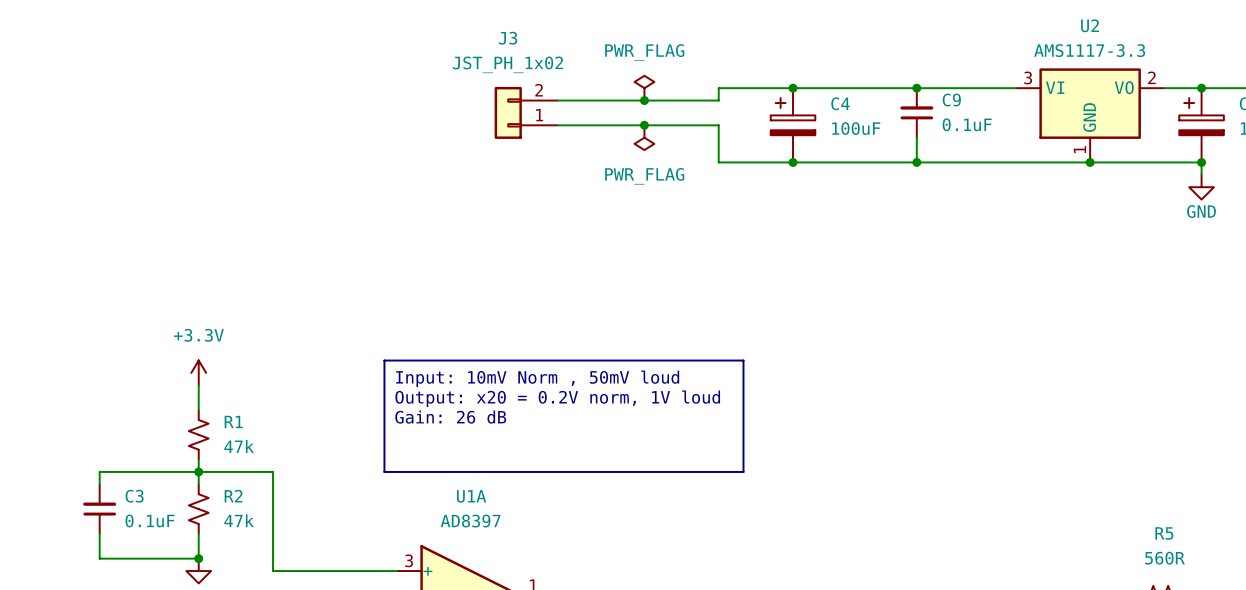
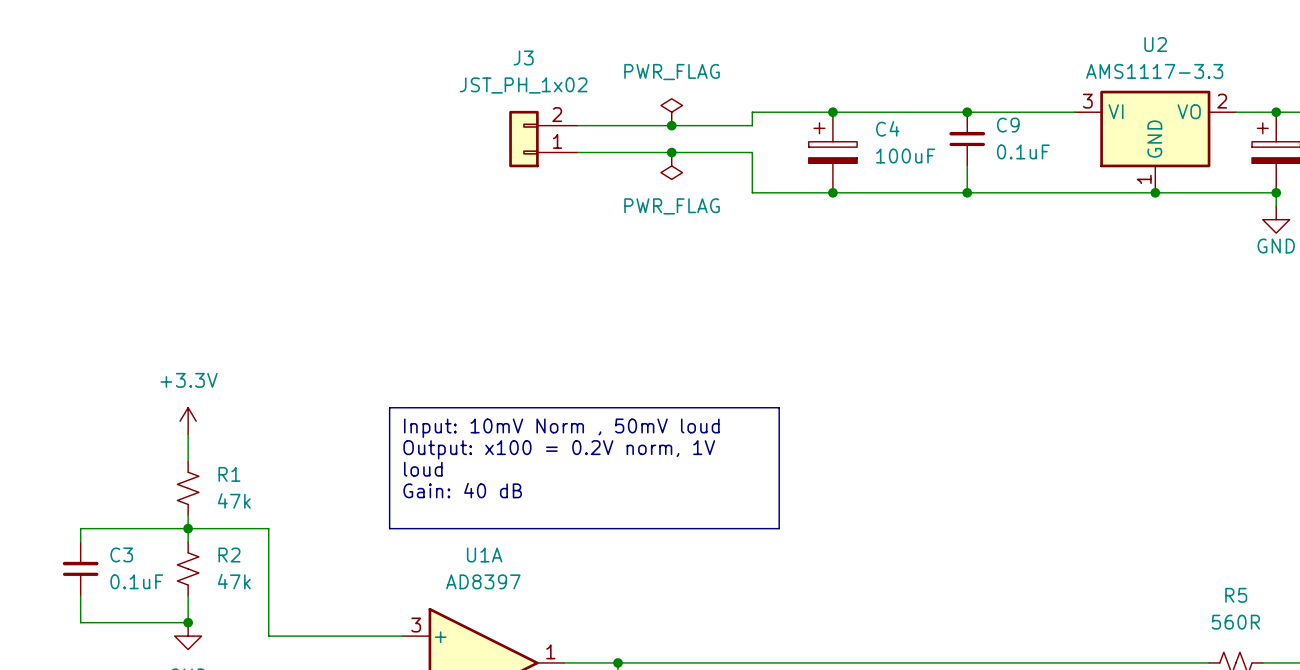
text: Output: x20 = 0.2V norm, 1V loud (557, 398) -> Output: x100 = 0.2V norm, 1V (559, 449)
text: Gain: 26 dB (450, 417) -> loud (423, 469)
text: none -> Gain: 40 dB (462, 490)

